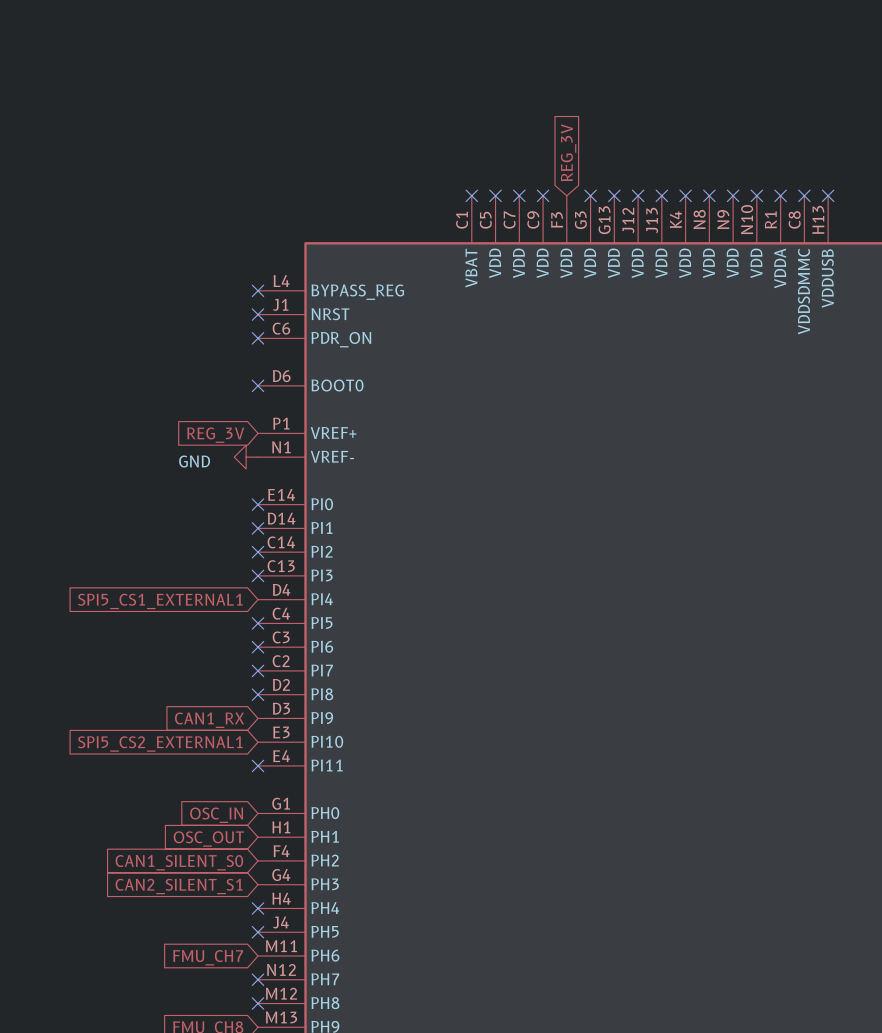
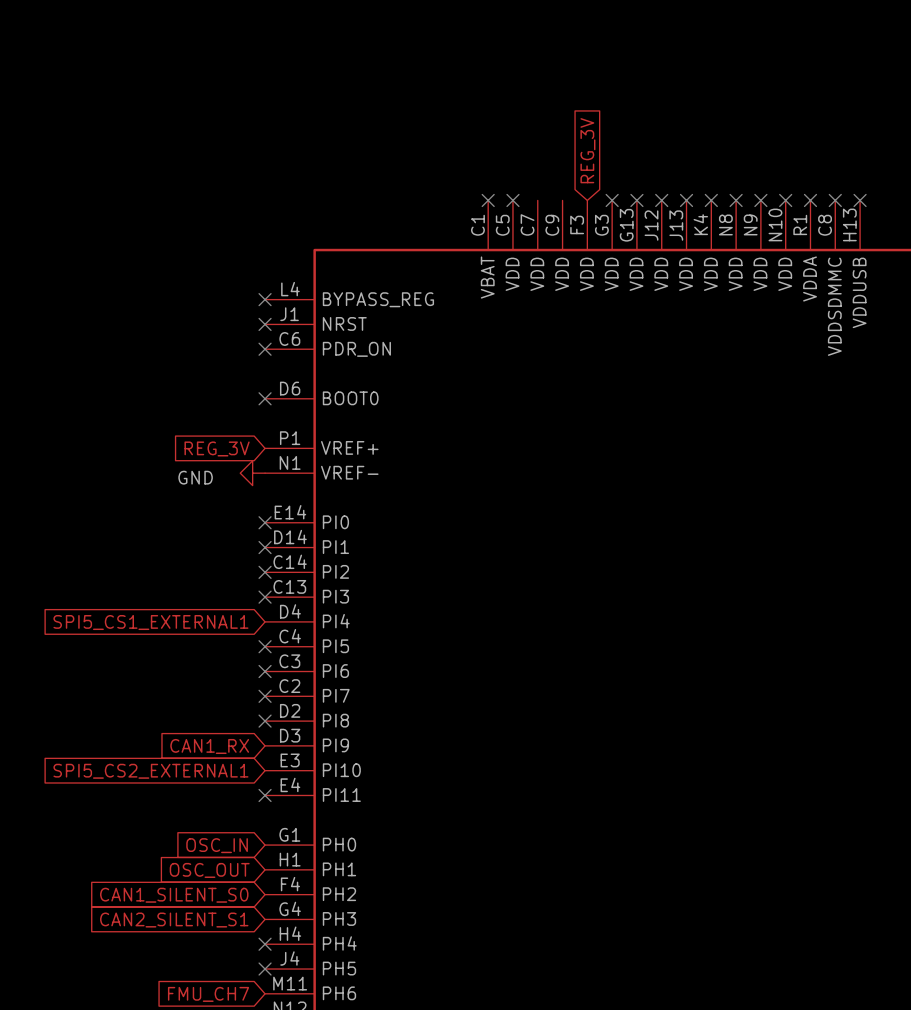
no-connect mark: (519, 195) -> none
no-connect mark: (543, 195) -> none

